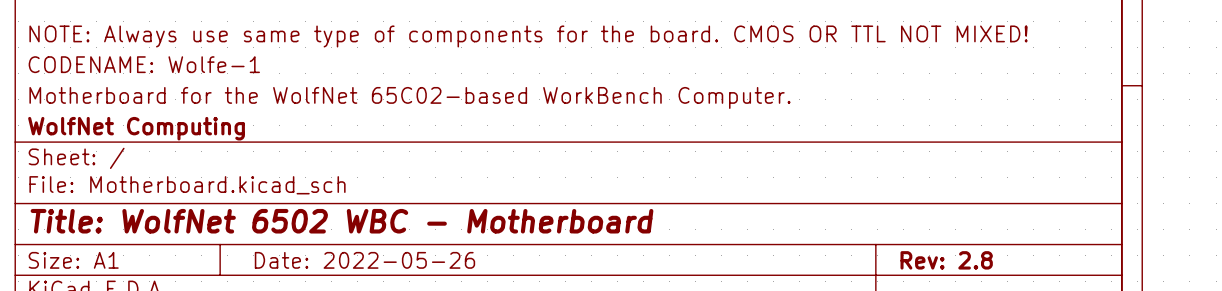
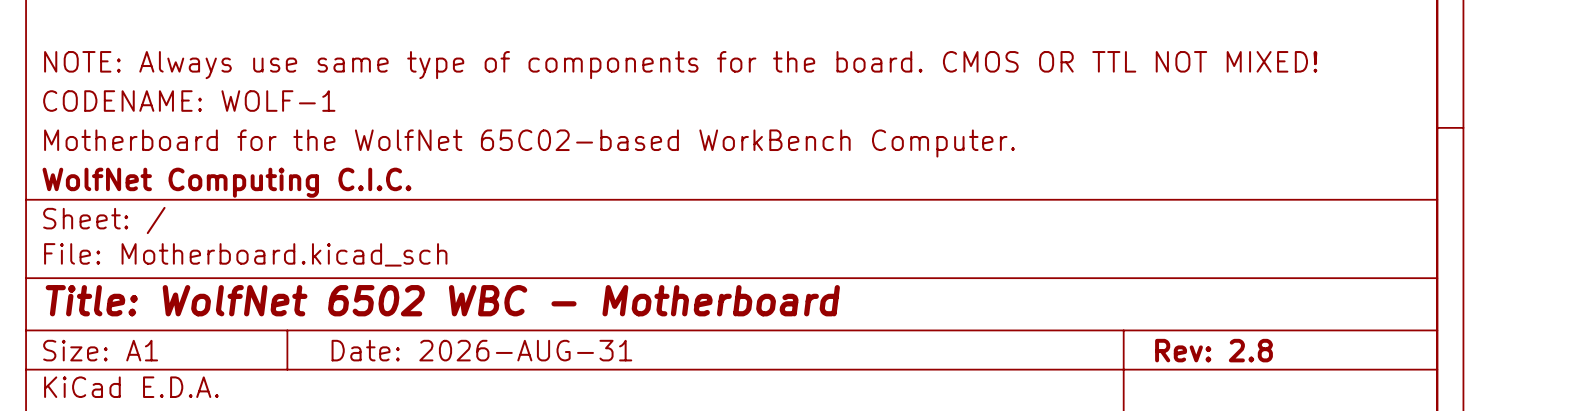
title block: CODENAME: Wolfe-1 (144, 64) -> CODENAME: WOLF-1 (189, 101)
title block: WolfNet Computing (136, 128) -> WolfNet Computing C.I.C. (226, 182)
title block: Date: 2022-05-26 (364, 260) -> Date: 2026-AUG-31 (481, 350)

